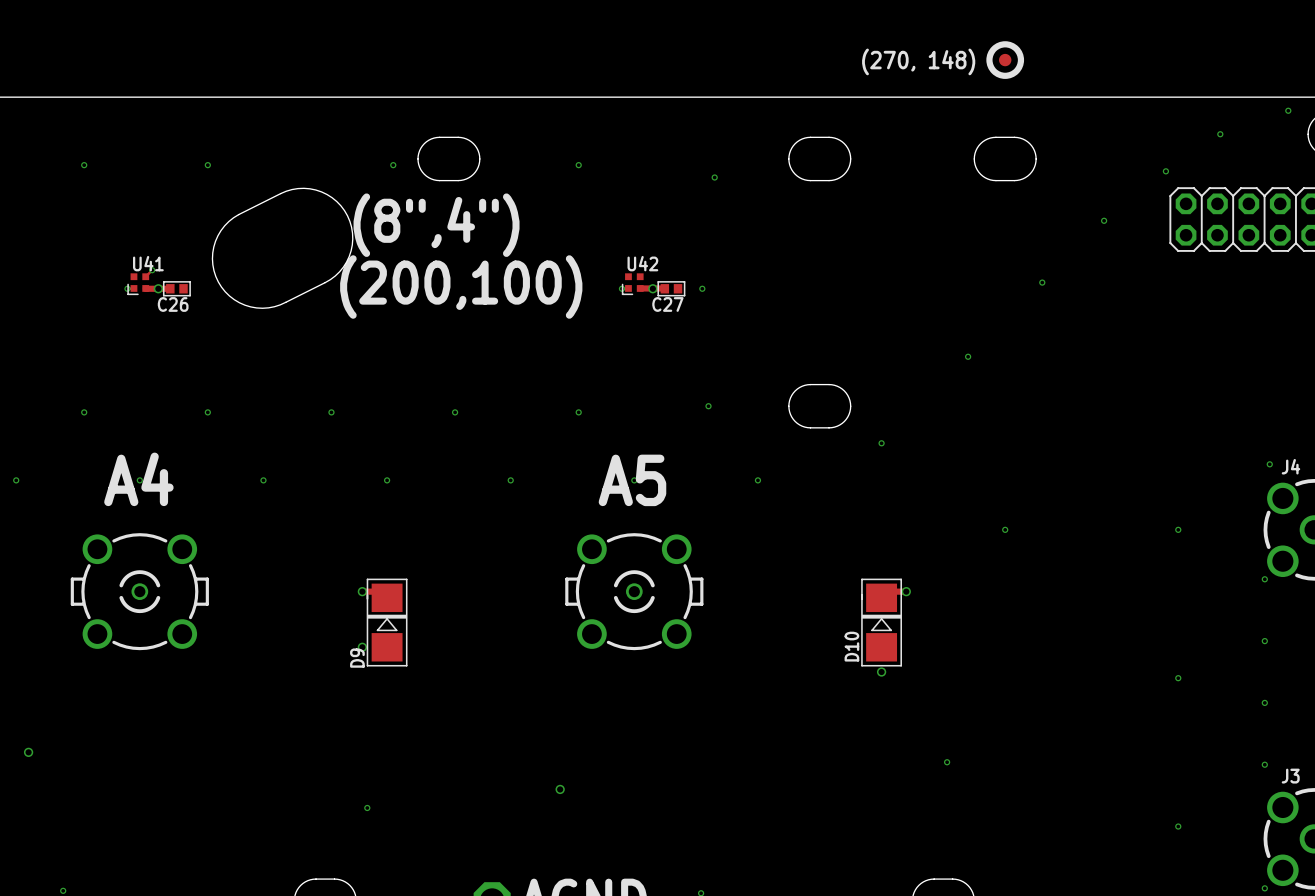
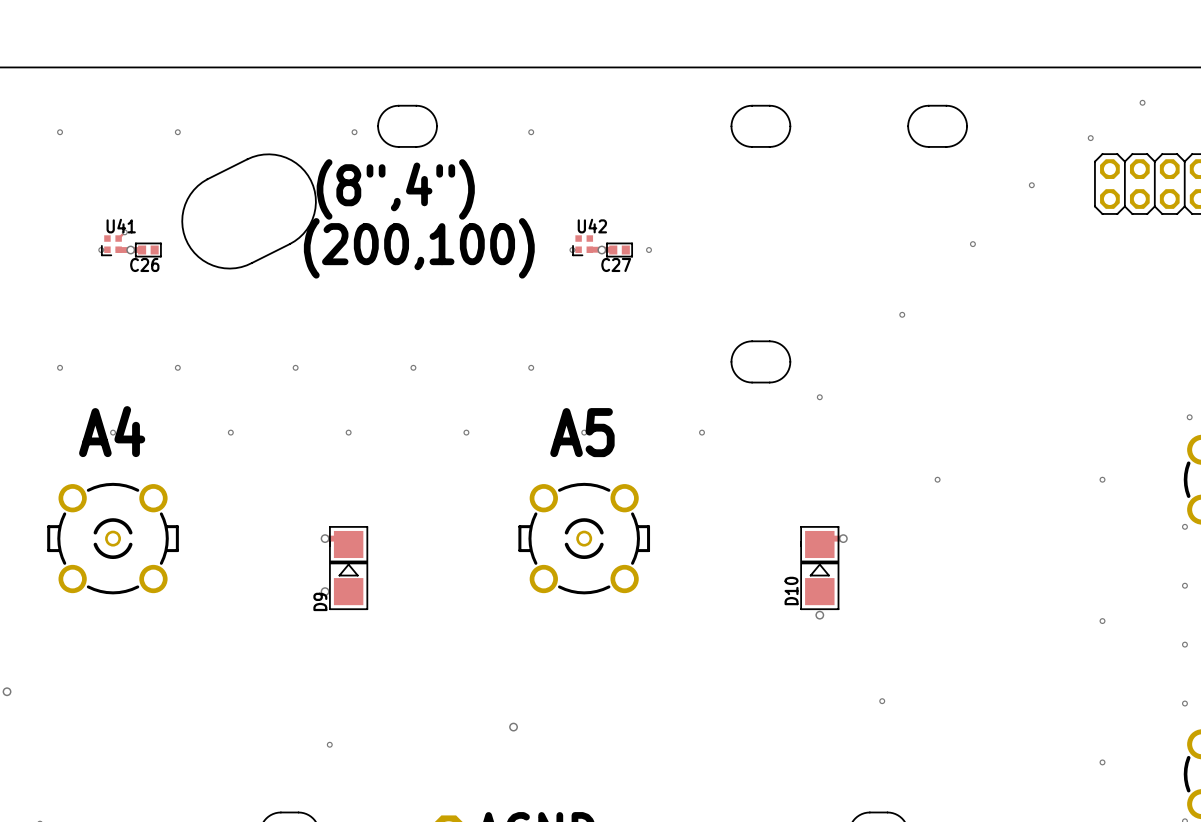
drawing: [986, 41, 1025, 79] -> none
text: (270, 148) (918, 61) -> none
via: (714, 177) -> none
via: (708, 406) -> none

